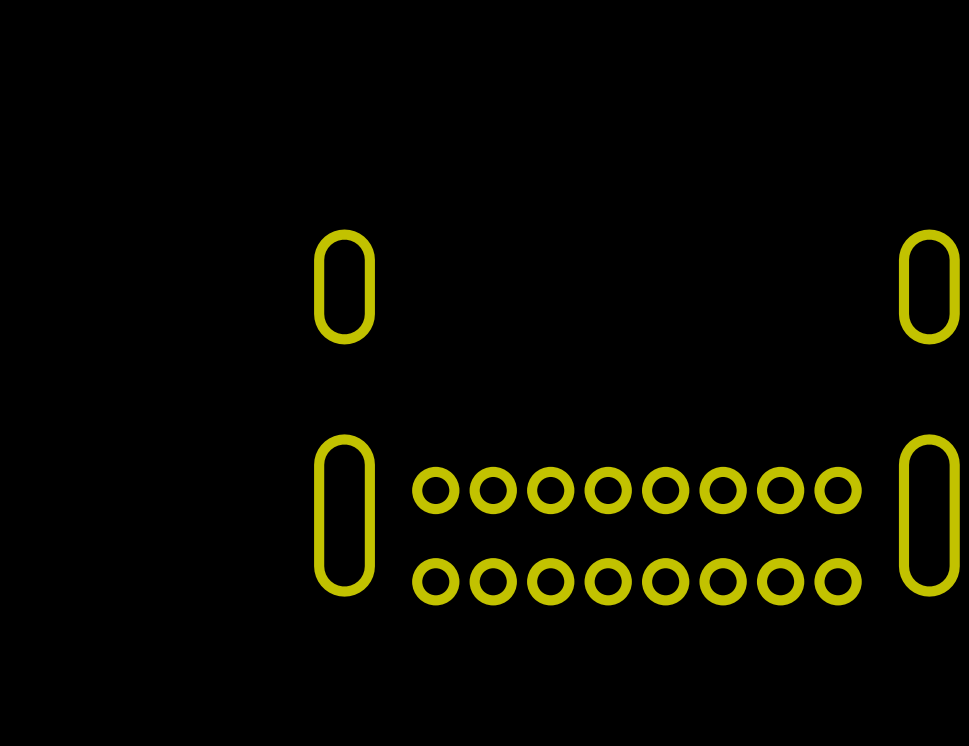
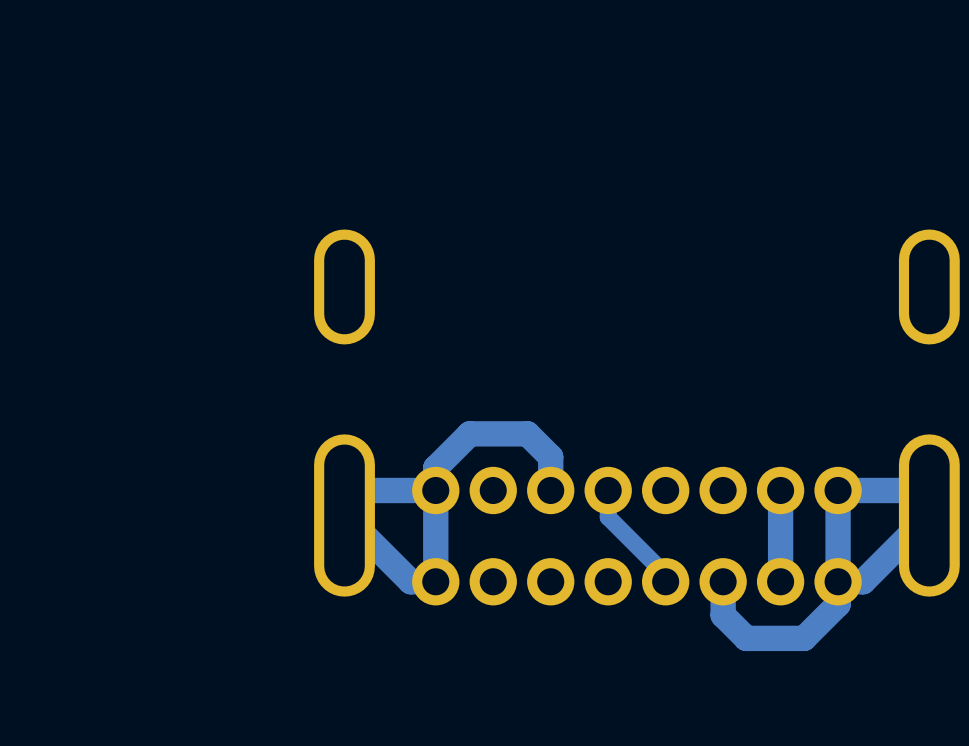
track: none -> (550, 490) (550, 457) (527, 433) (469, 433) (435, 467) (435, 581) (410, 581) (344, 515) (369, 490) (435, 490)
track: none -> (608, 490) (608, 517) (665, 574) (665, 581)
track: none -> (780, 490) (780, 581)
track: none -> (838, 581) (863, 581) (929, 515) (904, 490) (838, 490) (838, 604) (804, 638) (746, 638) (723, 615) (723, 581)

